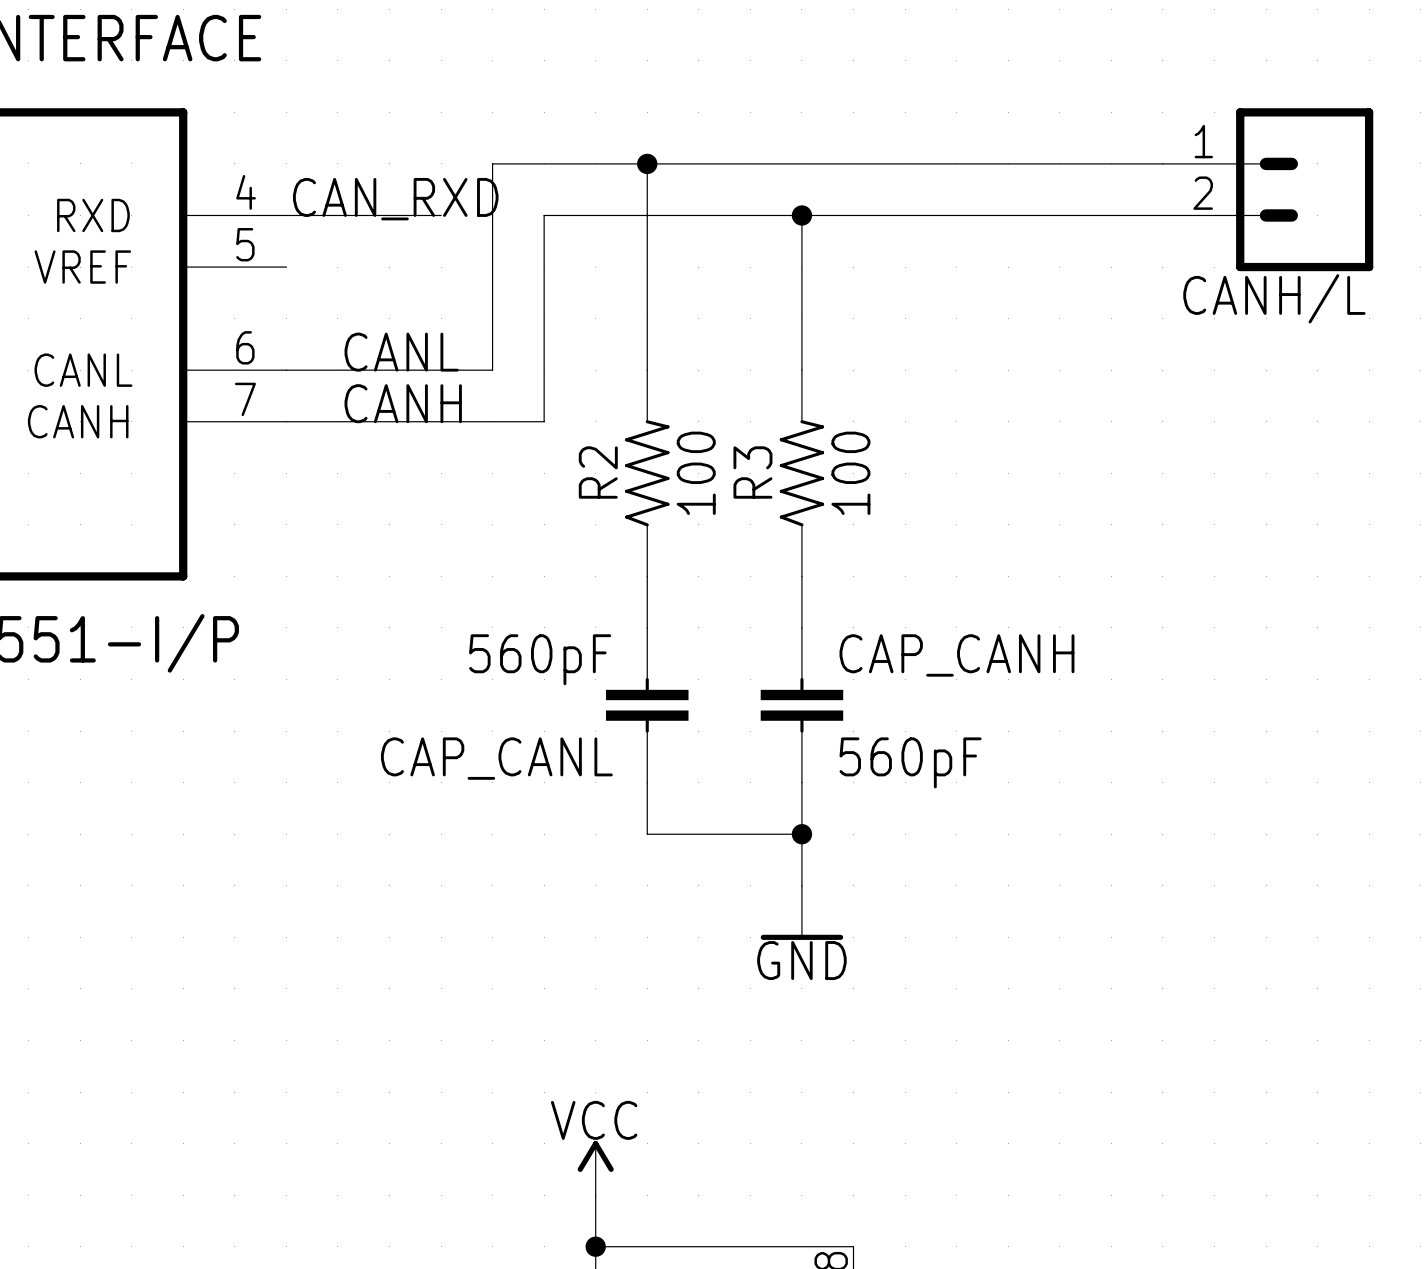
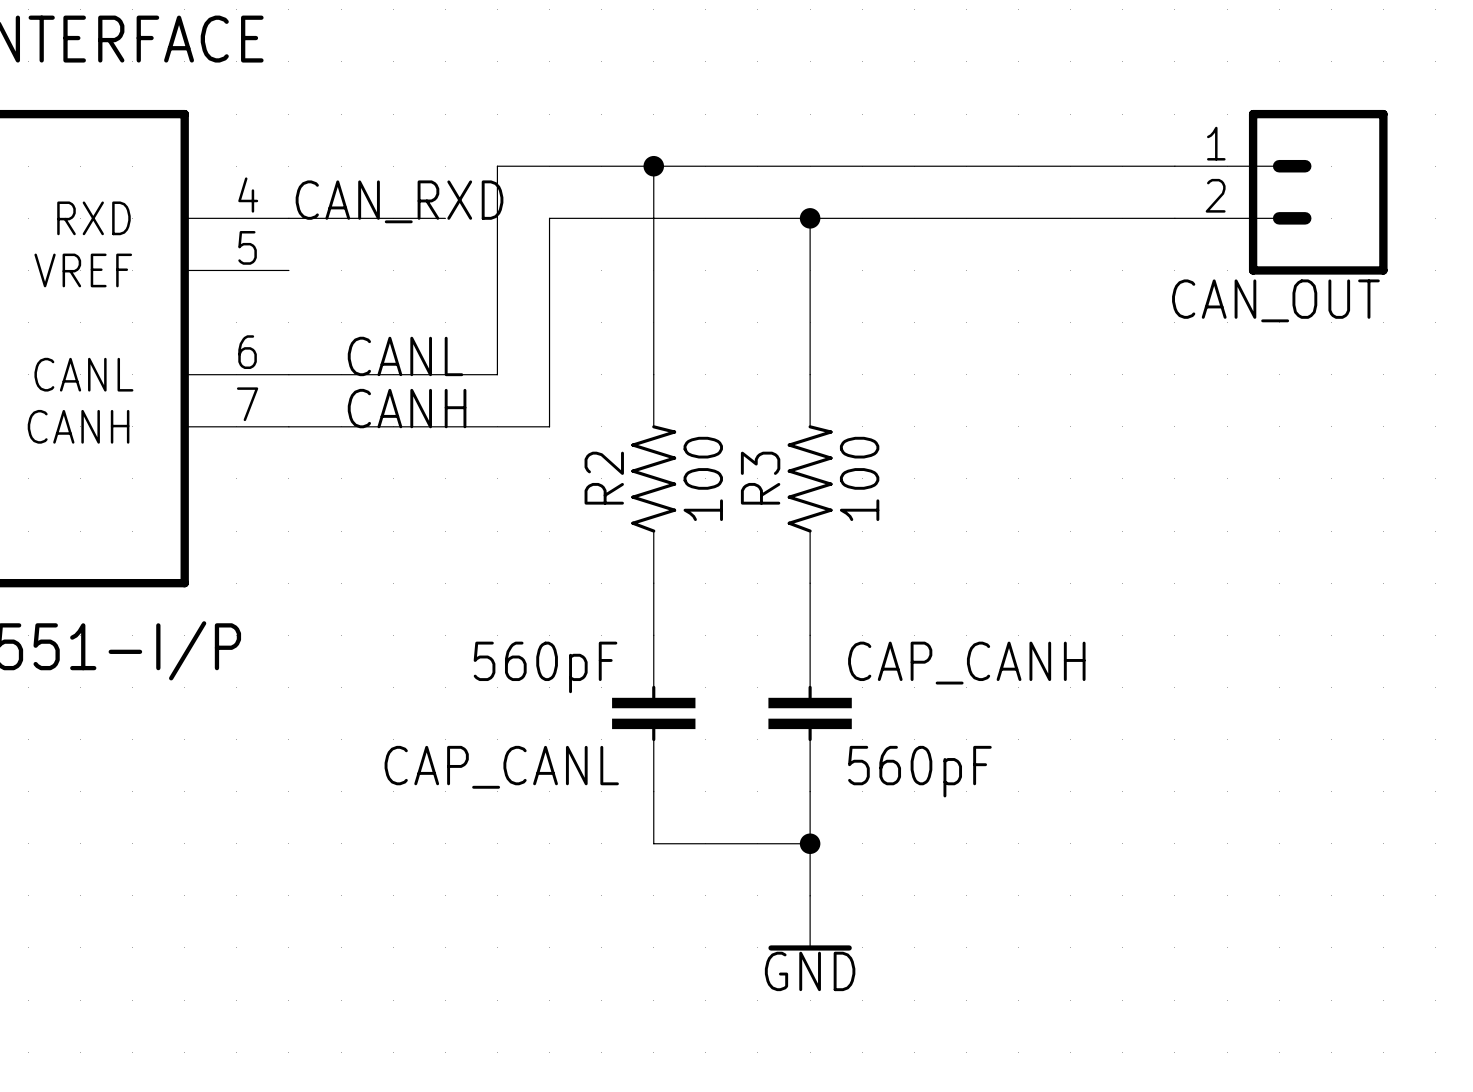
CANH/L name: CANH/L (1274, 298) -> CAN_OUT (1275, 300)

